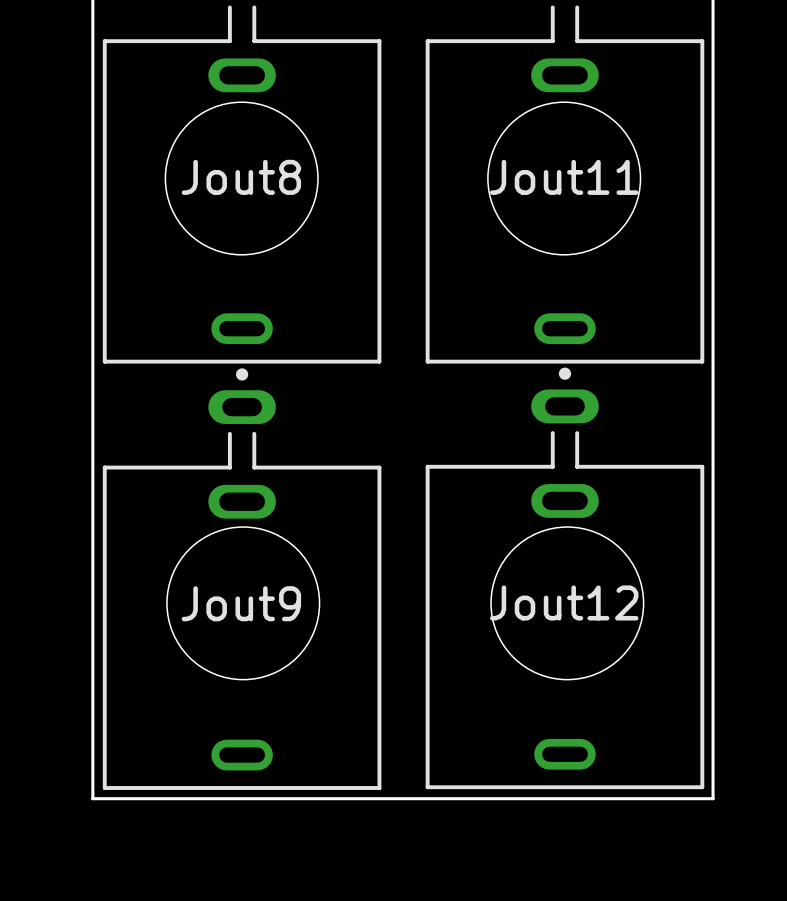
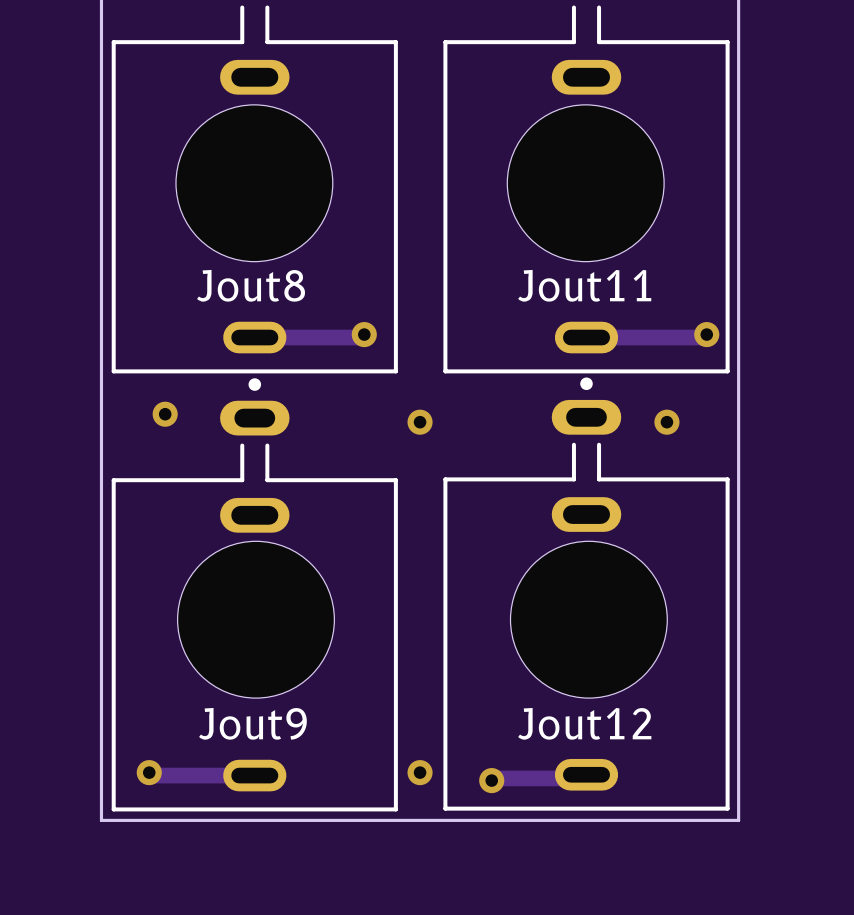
Jout8 name position: Jout8 (241, 177) -> Jout8 (251, 285)
Jout11 name position: Jout11 (564, 177) -> Jout11 (584, 285)
track: none -> (364, 334) (361, 337) (254, 337)
via: none -> (364, 334)
track: none -> (706, 334) (703, 337) (586, 337)
via: none -> (706, 334)
via: none -> (165, 414)
via: none -> (420, 422)
via: none -> (666, 422)
Jout12 name position: Jout12 (564, 602) -> Jout12 (584, 723)
Jout9 name position: Jout9 (241, 603) -> Jout9 (252, 723)
track: none -> (149, 772) (152, 775) (254, 775)
via: none -> (149, 772)
via: none -> (420, 772)
track: none -> (588, 778) (493, 778) (491, 780)
via: none -> (491, 780)

